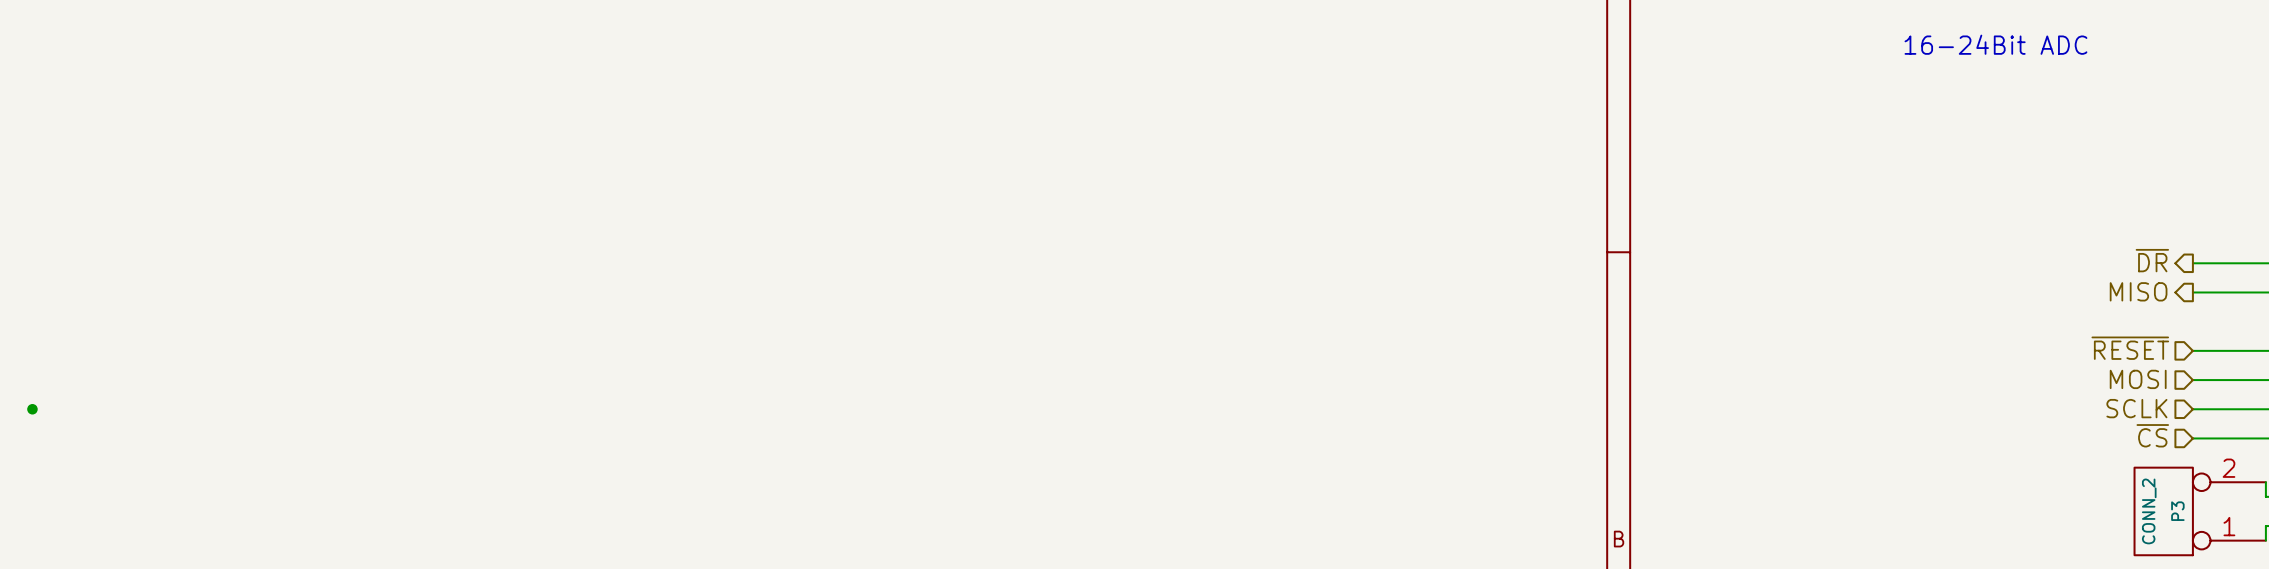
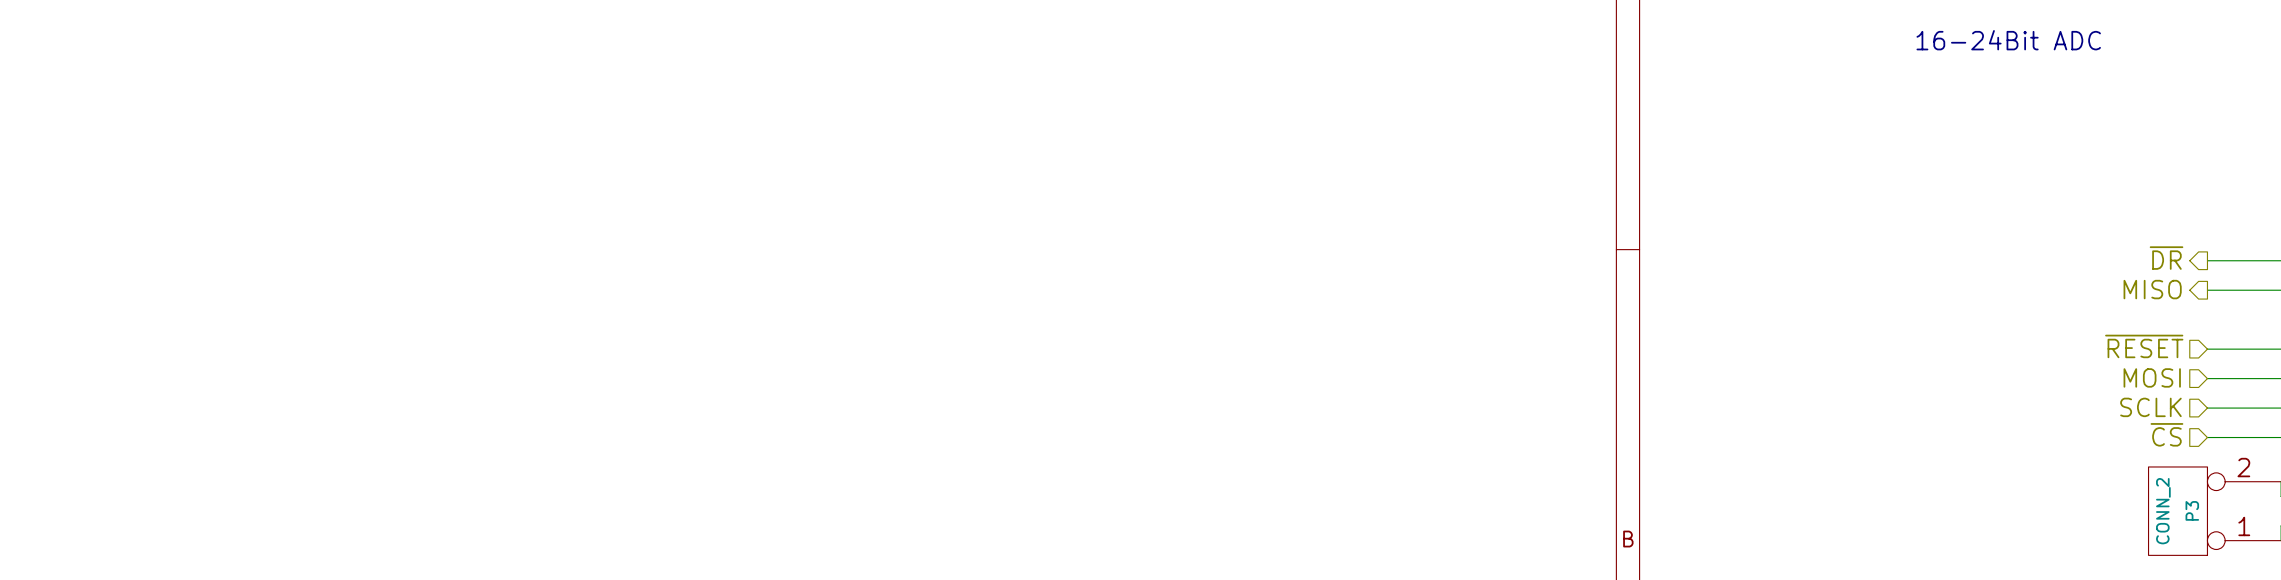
junction: (32, 409) -> none

